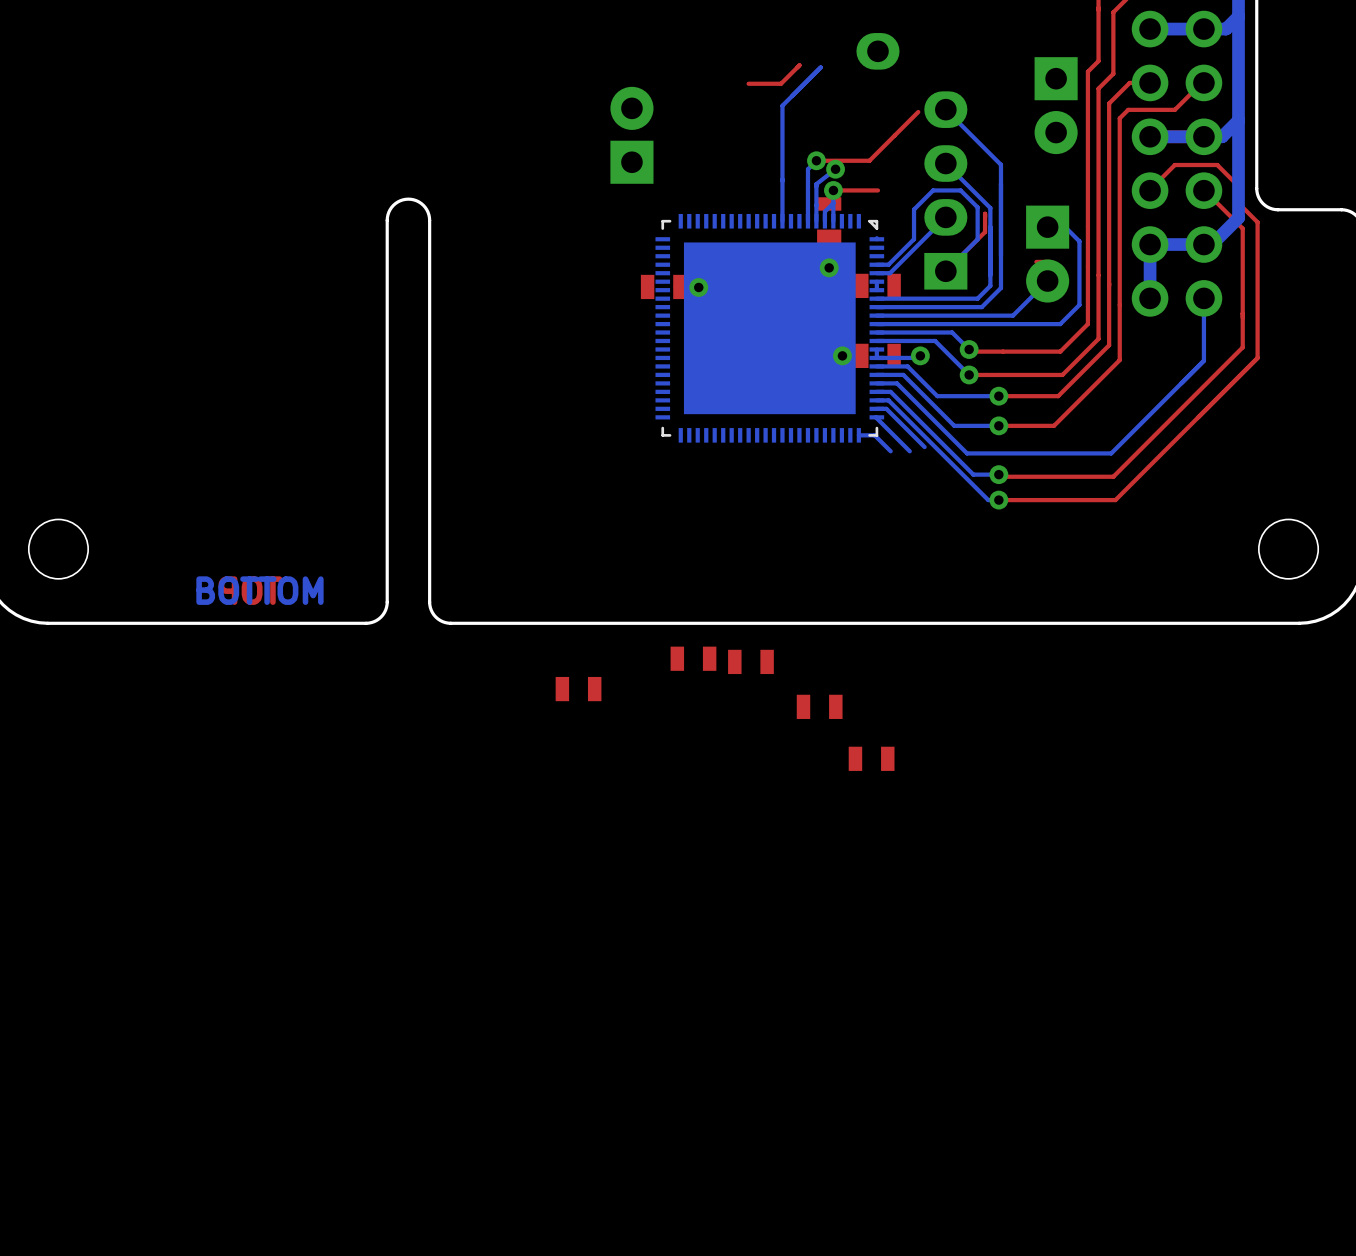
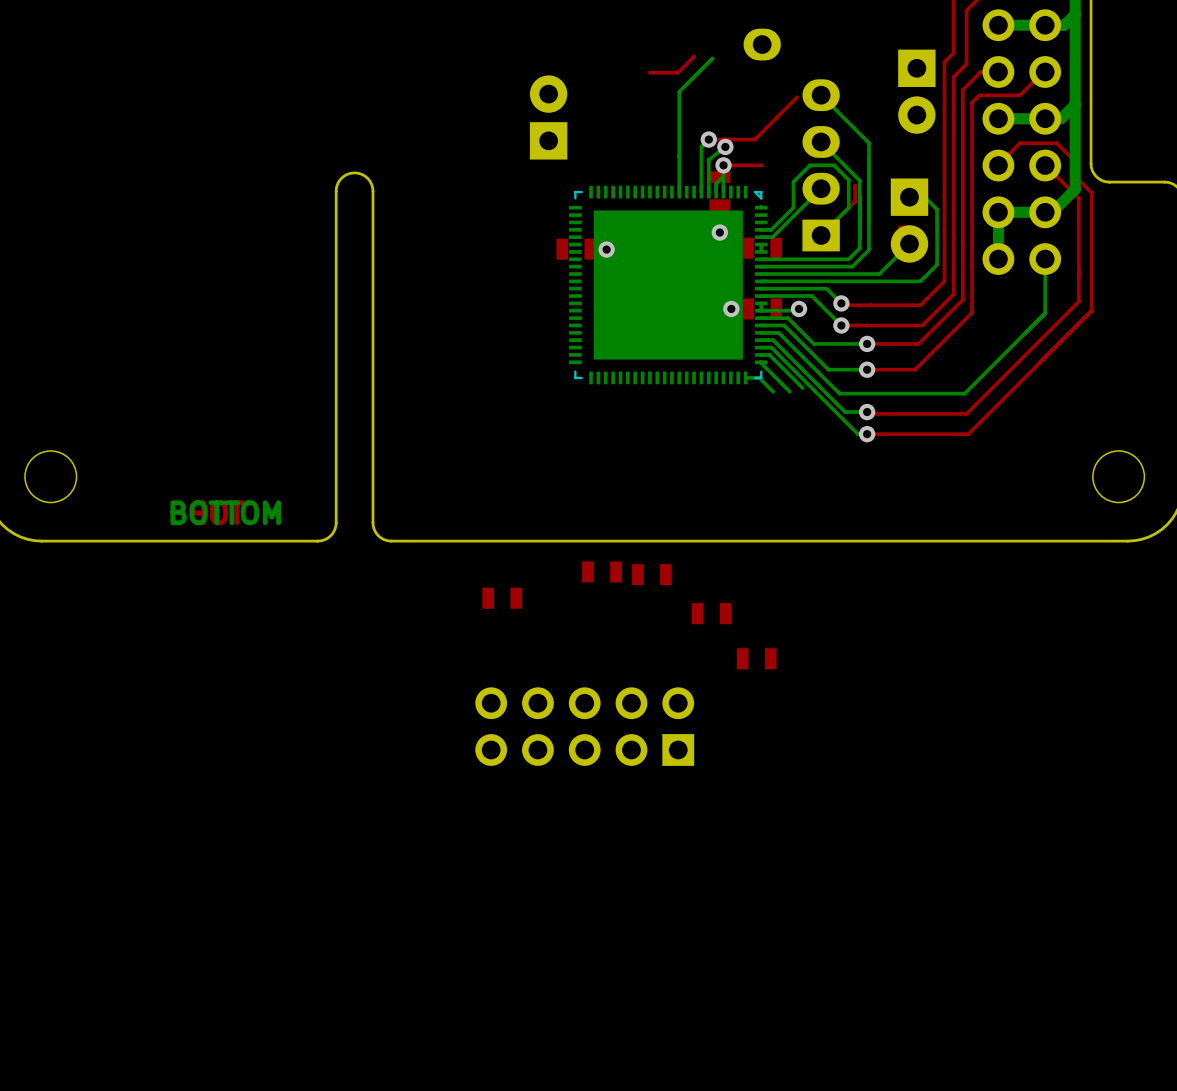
part: none -> (584, 726)

